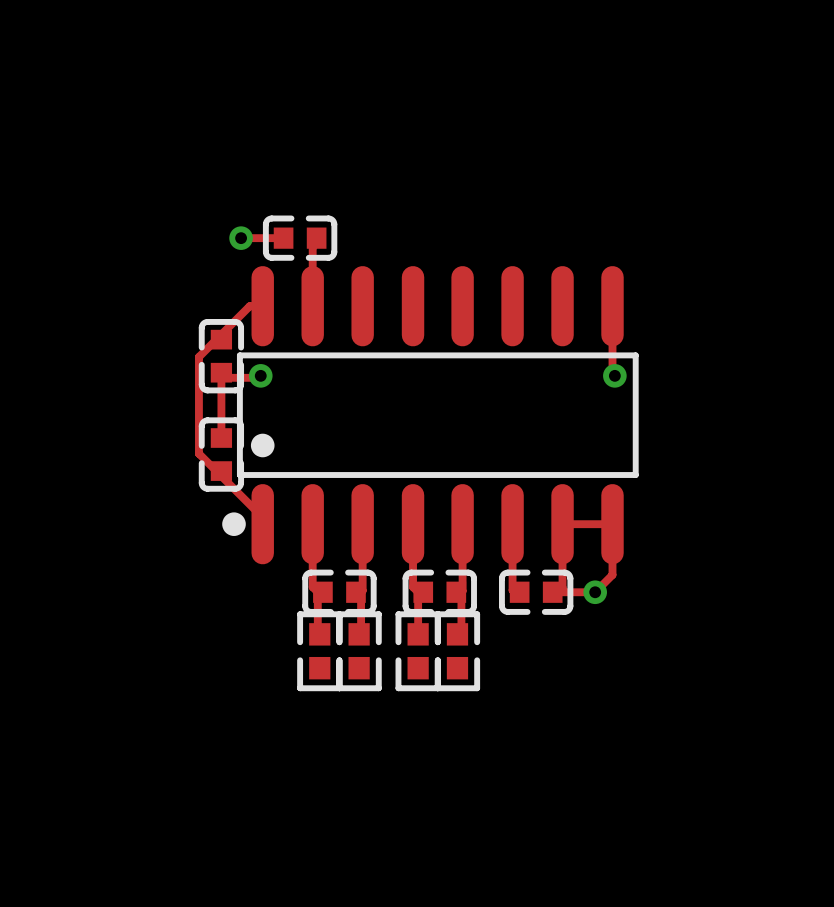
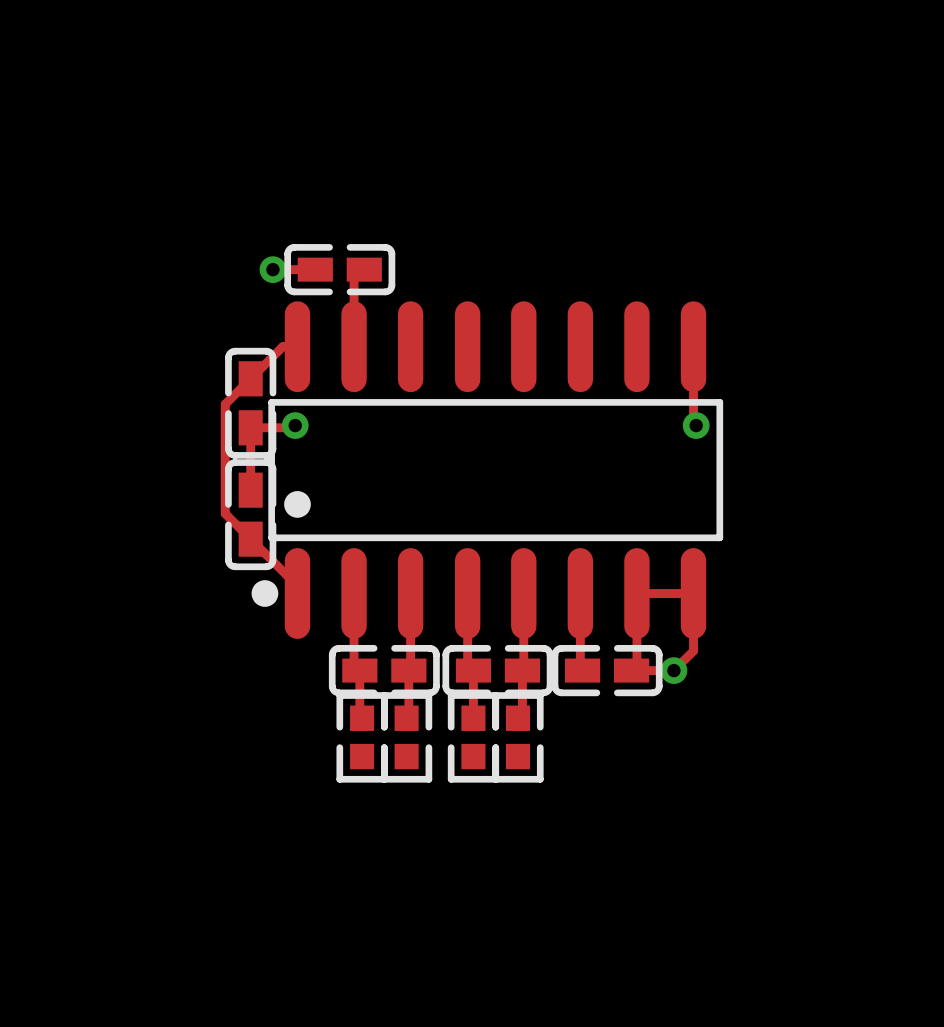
part footprint: [262, 215, 338, 261] -> [284, 244, 396, 296]
part footprint: [198, 319, 245, 394] -> [225, 347, 277, 459]
part footprint: [198, 417, 245, 492] -> [225, 459, 277, 571]
part footprint: [302, 569, 377, 615] -> [328, 644, 440, 697]
part footprint: [402, 569, 477, 615] -> [442, 644, 554, 697]
part footprint: [498, 569, 574, 615] -> [551, 644, 663, 697]

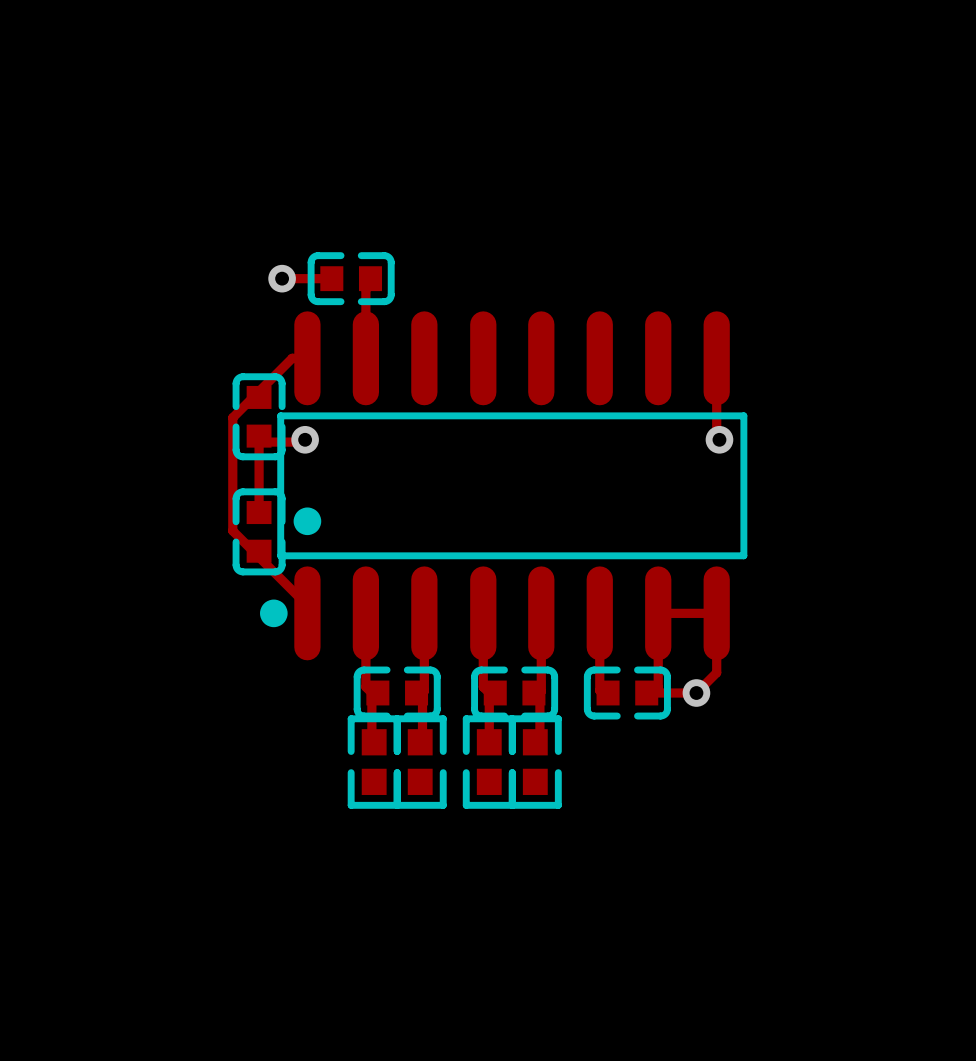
part footprint: [284, 244, 396, 296] -> [307, 252, 395, 306]
part footprint: [225, 347, 277, 459] -> [232, 373, 286, 461]
part footprint: [225, 459, 277, 571] -> [232, 488, 286, 576]
part footprint: [328, 644, 440, 697] -> [353, 666, 441, 720]
part footprint: [442, 644, 554, 697] -> [471, 666, 559, 720]
part footprint: [551, 644, 663, 697] -> [583, 666, 671, 720]

